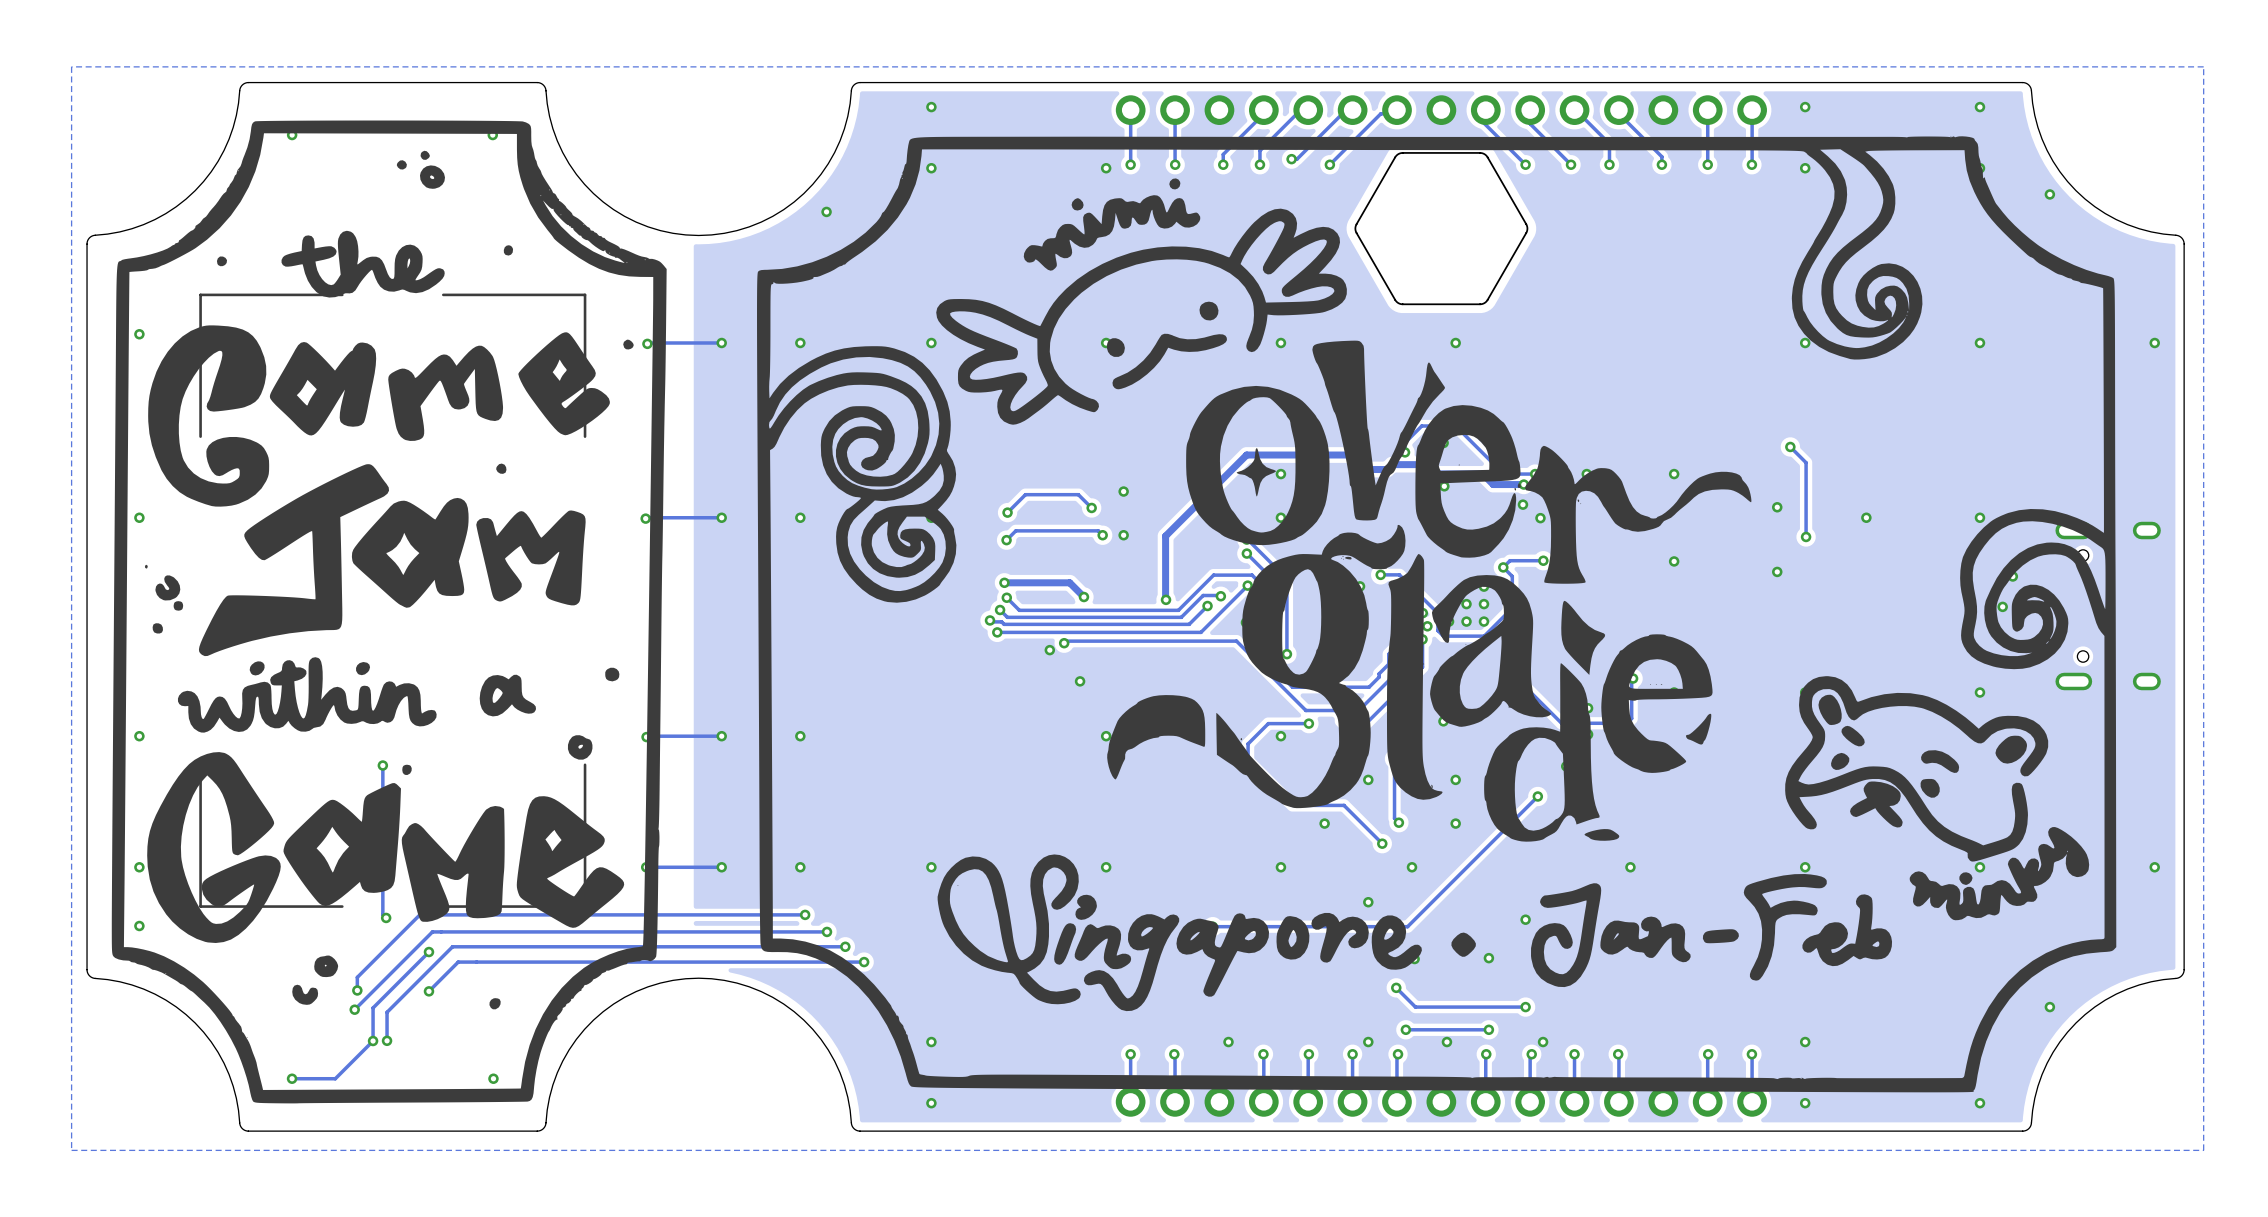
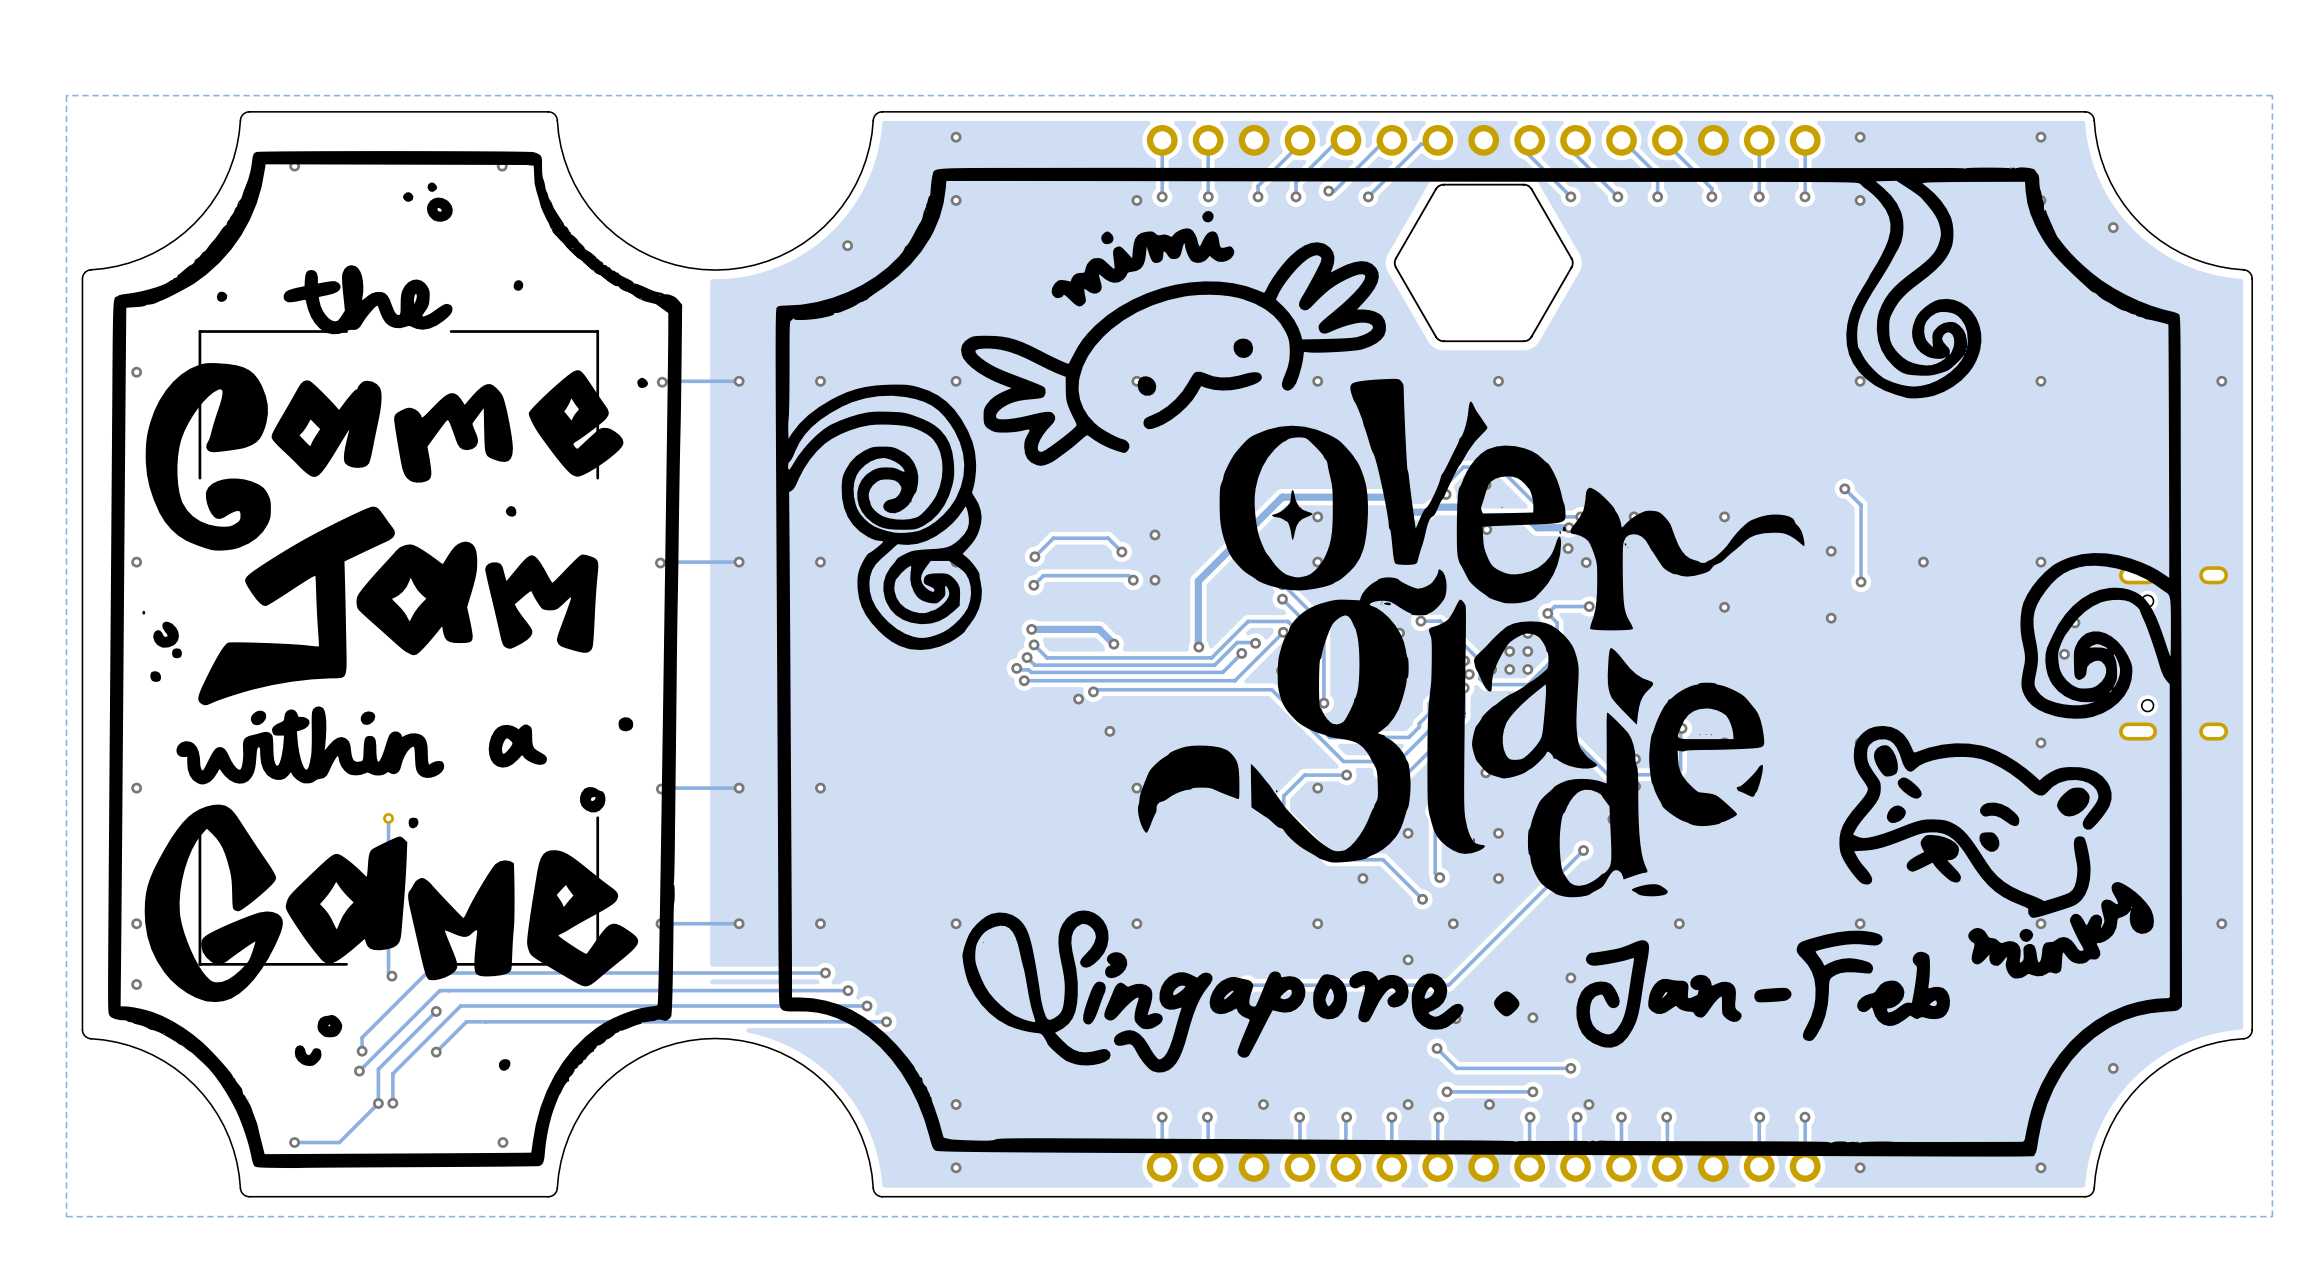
drawing shape: [111, 120, 2117, 1104] -> [108, 151, 2183, 1169]
via: (1805, 1042) -> none

